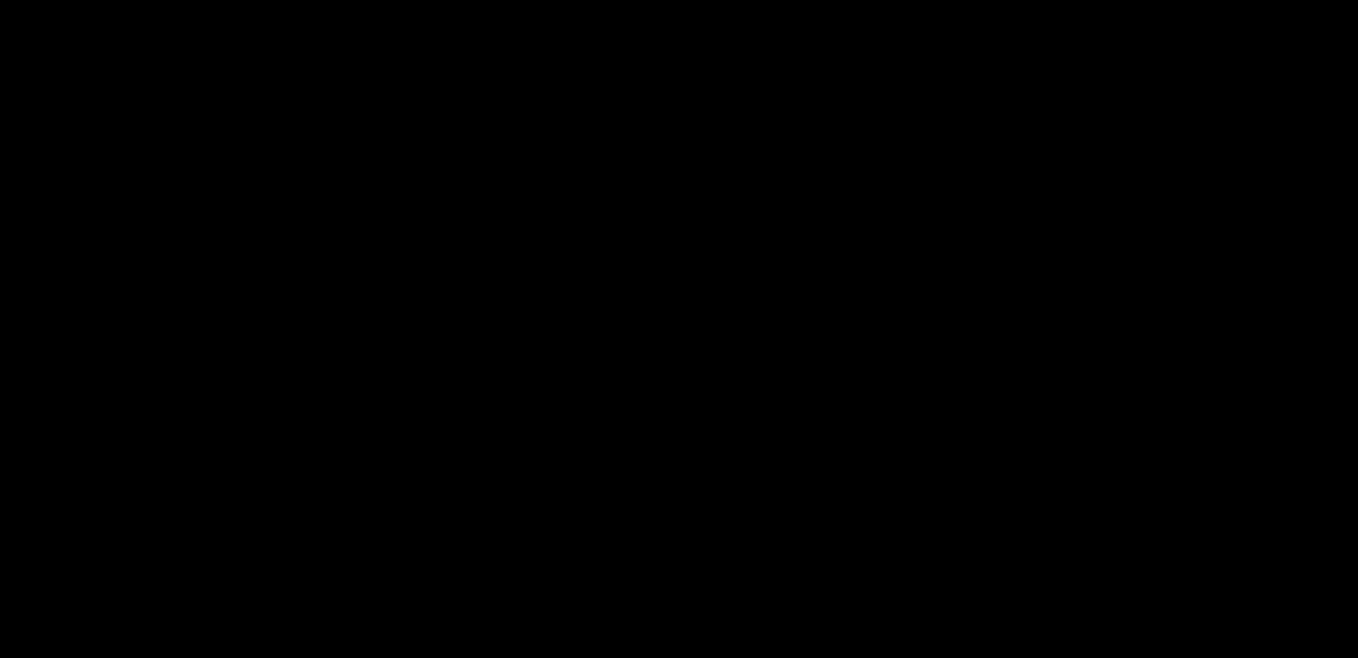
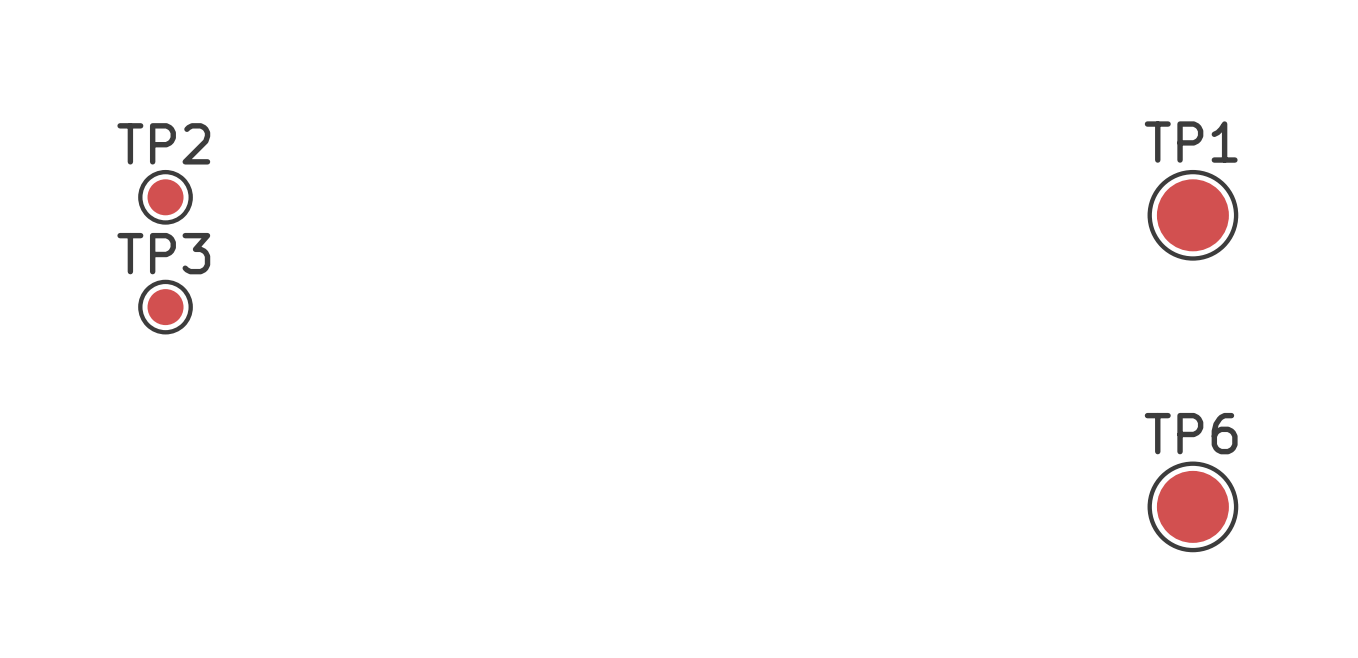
TP2: none -> (165, 197)
TP1: none -> (1192, 215)
TP3: none -> (165, 307)
TP6: none -> (1192, 506)

